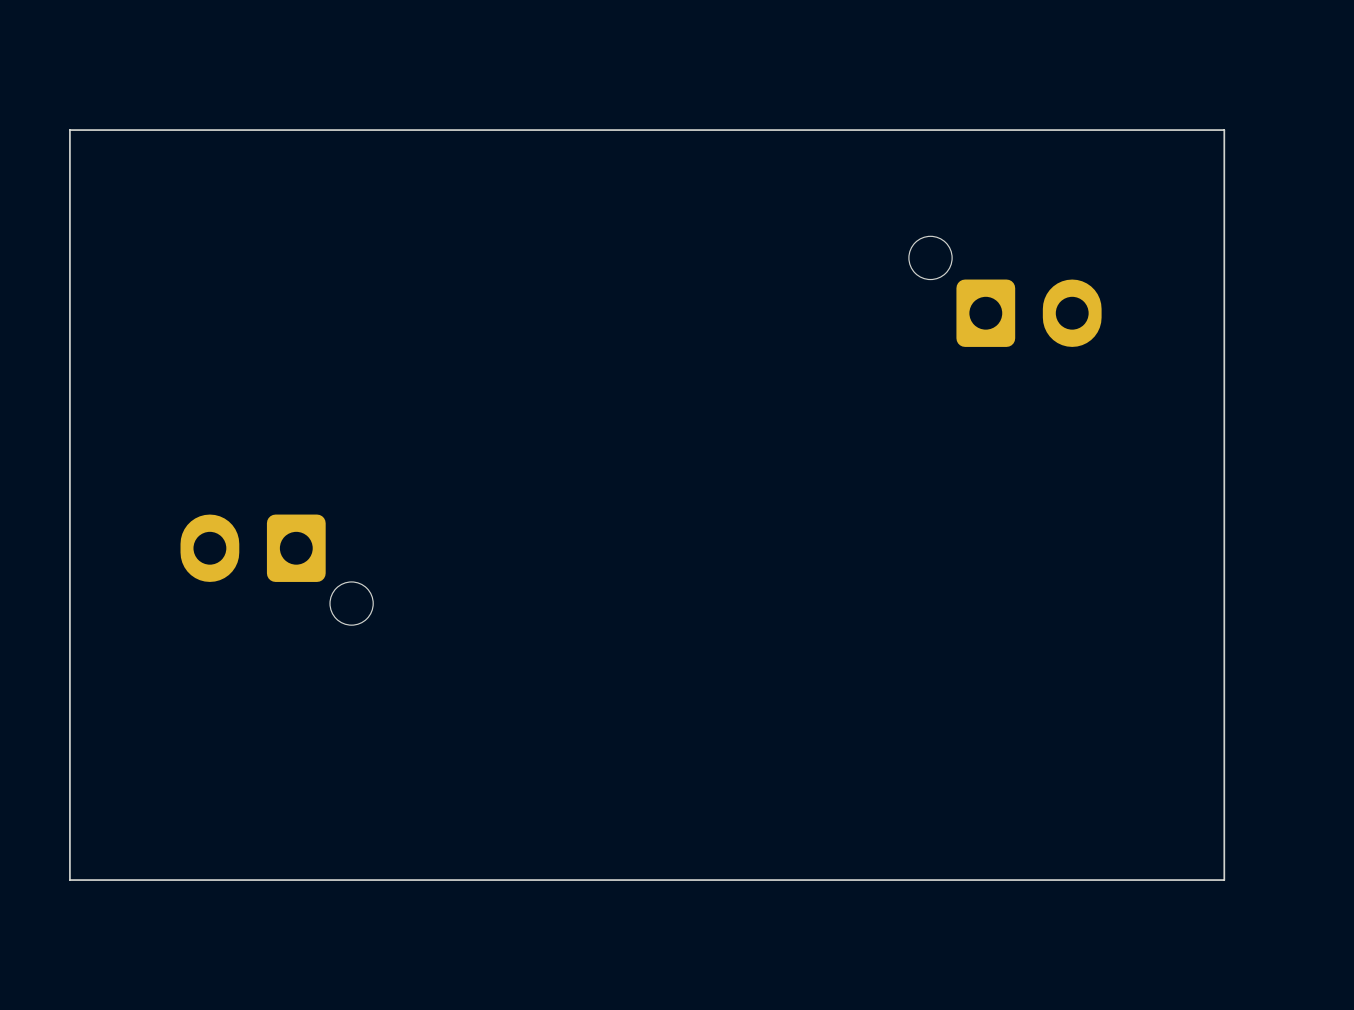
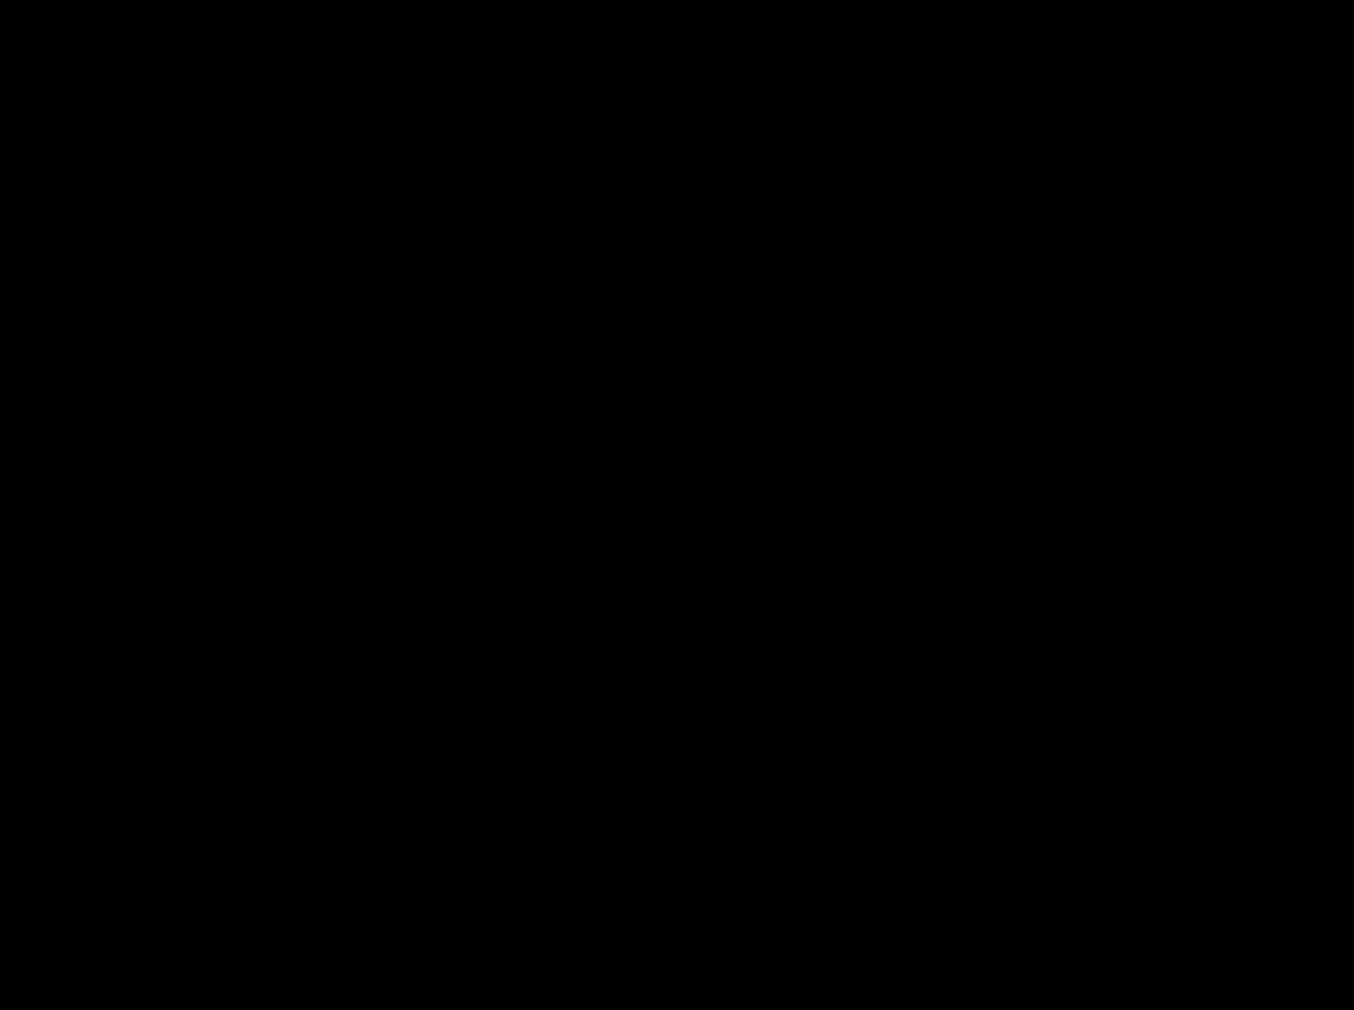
board edge: (1224, 130) (69, 130) (69, 880) (1224, 880) (1224, 130) -> none
part: (1005, 291) -> none
part: (276, 569) -> none

